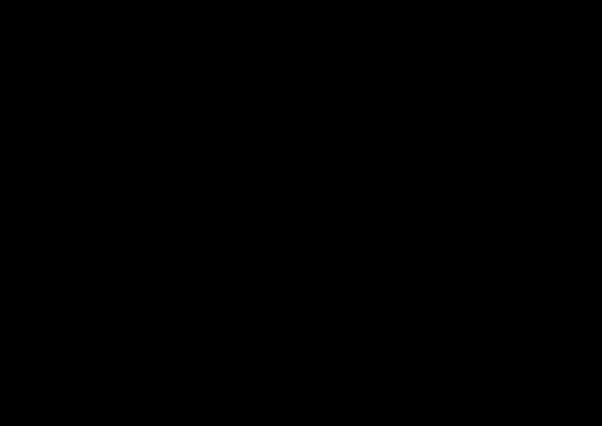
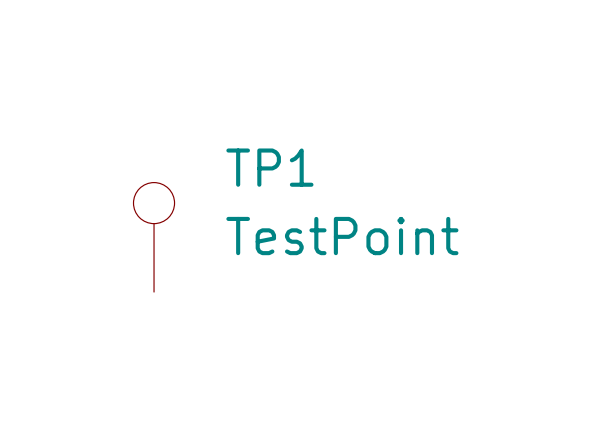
TP1: none -> TestPoint (154, 237)

